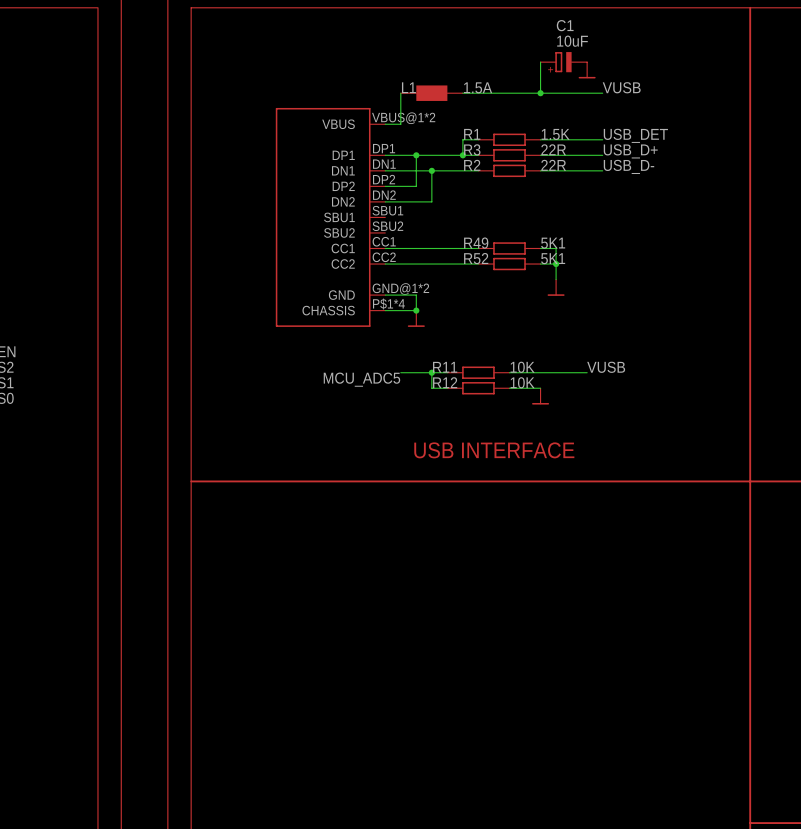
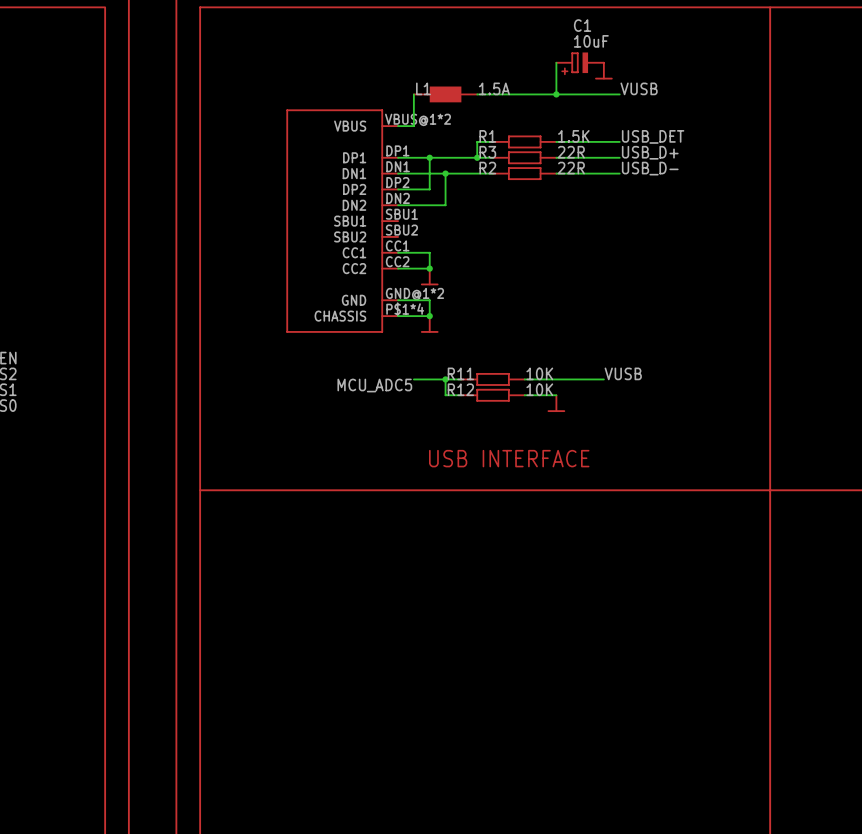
wire: (416, 248) (478, 248) -> (429, 252) (429, 268)
R49: 5K1 (509, 248) -> none
wire: (540, 248) (556, 248) (556, 279) -> none
wire: (416, 264) (478, 264) -> none
junction: none -> (429, 268)
R52: 5K1 (509, 264) -> none
wire: (540, 264) (556, 264) -> none
junction: (556, 264) -> none
power symbol position: (556, 287) -> (429, 276)

